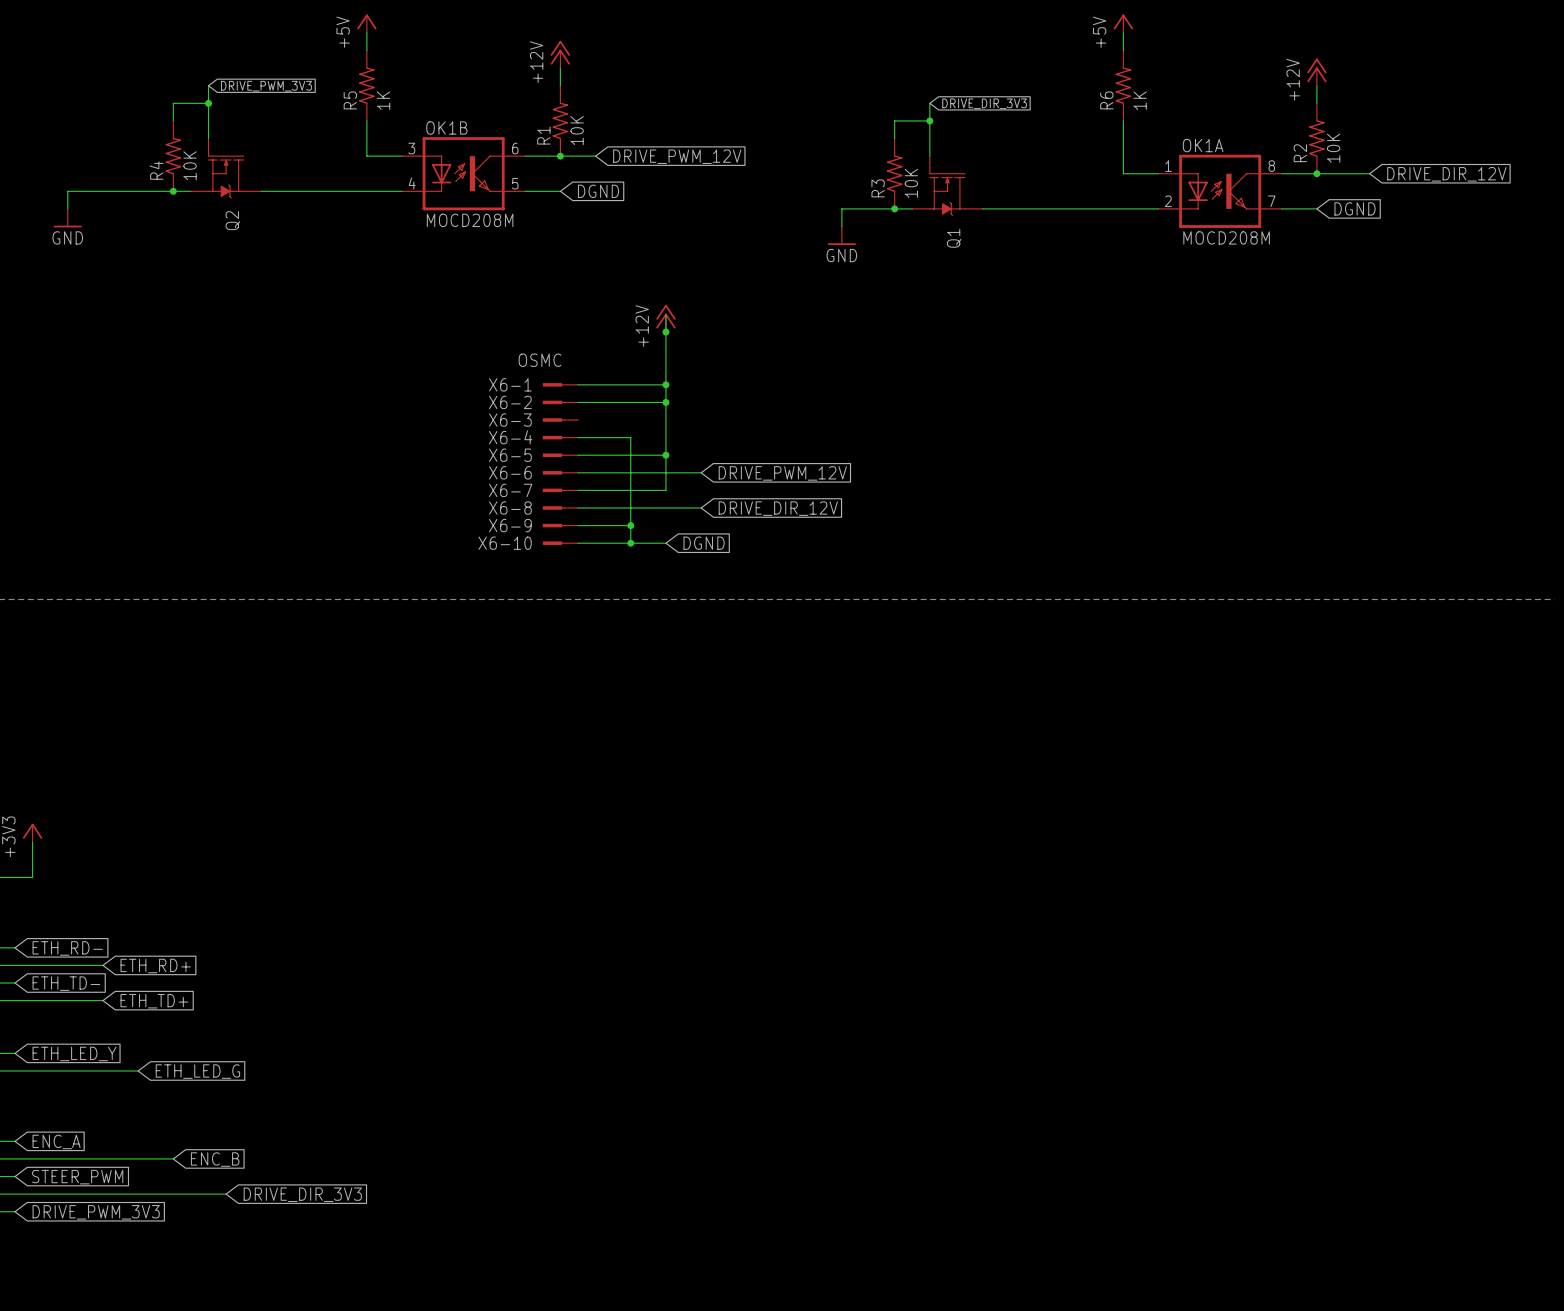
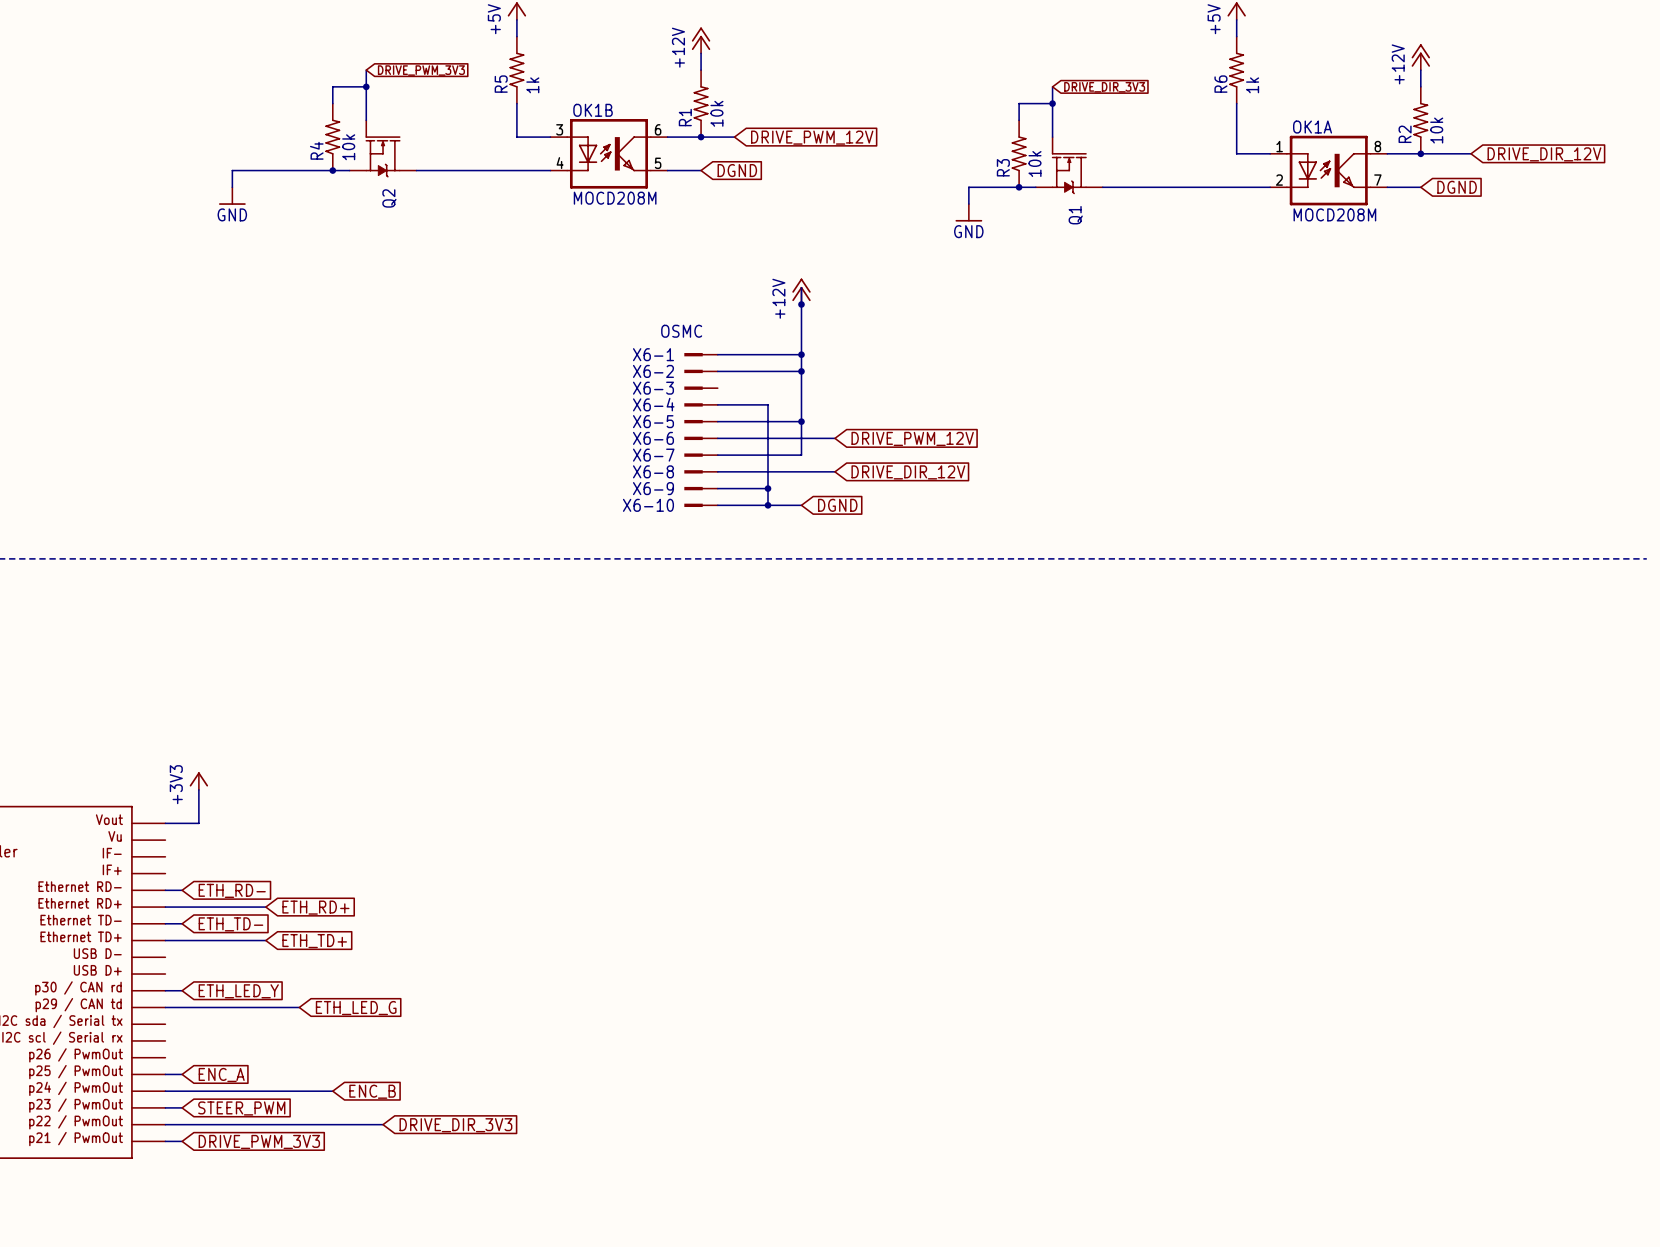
R5 value: 1K (383, 100) -> 1k (532, 85)
R6 value: 1K (1140, 100) -> 1k (1252, 85)
R1 value: 10K (577, 130) -> 10k (716, 113)
R2 value: 10K (1333, 148) -> 10k (1436, 130)
R4 value: 10K (190, 165) -> 10k (348, 147)
R3 value: 10K (911, 183) -> 10k (1034, 164)

